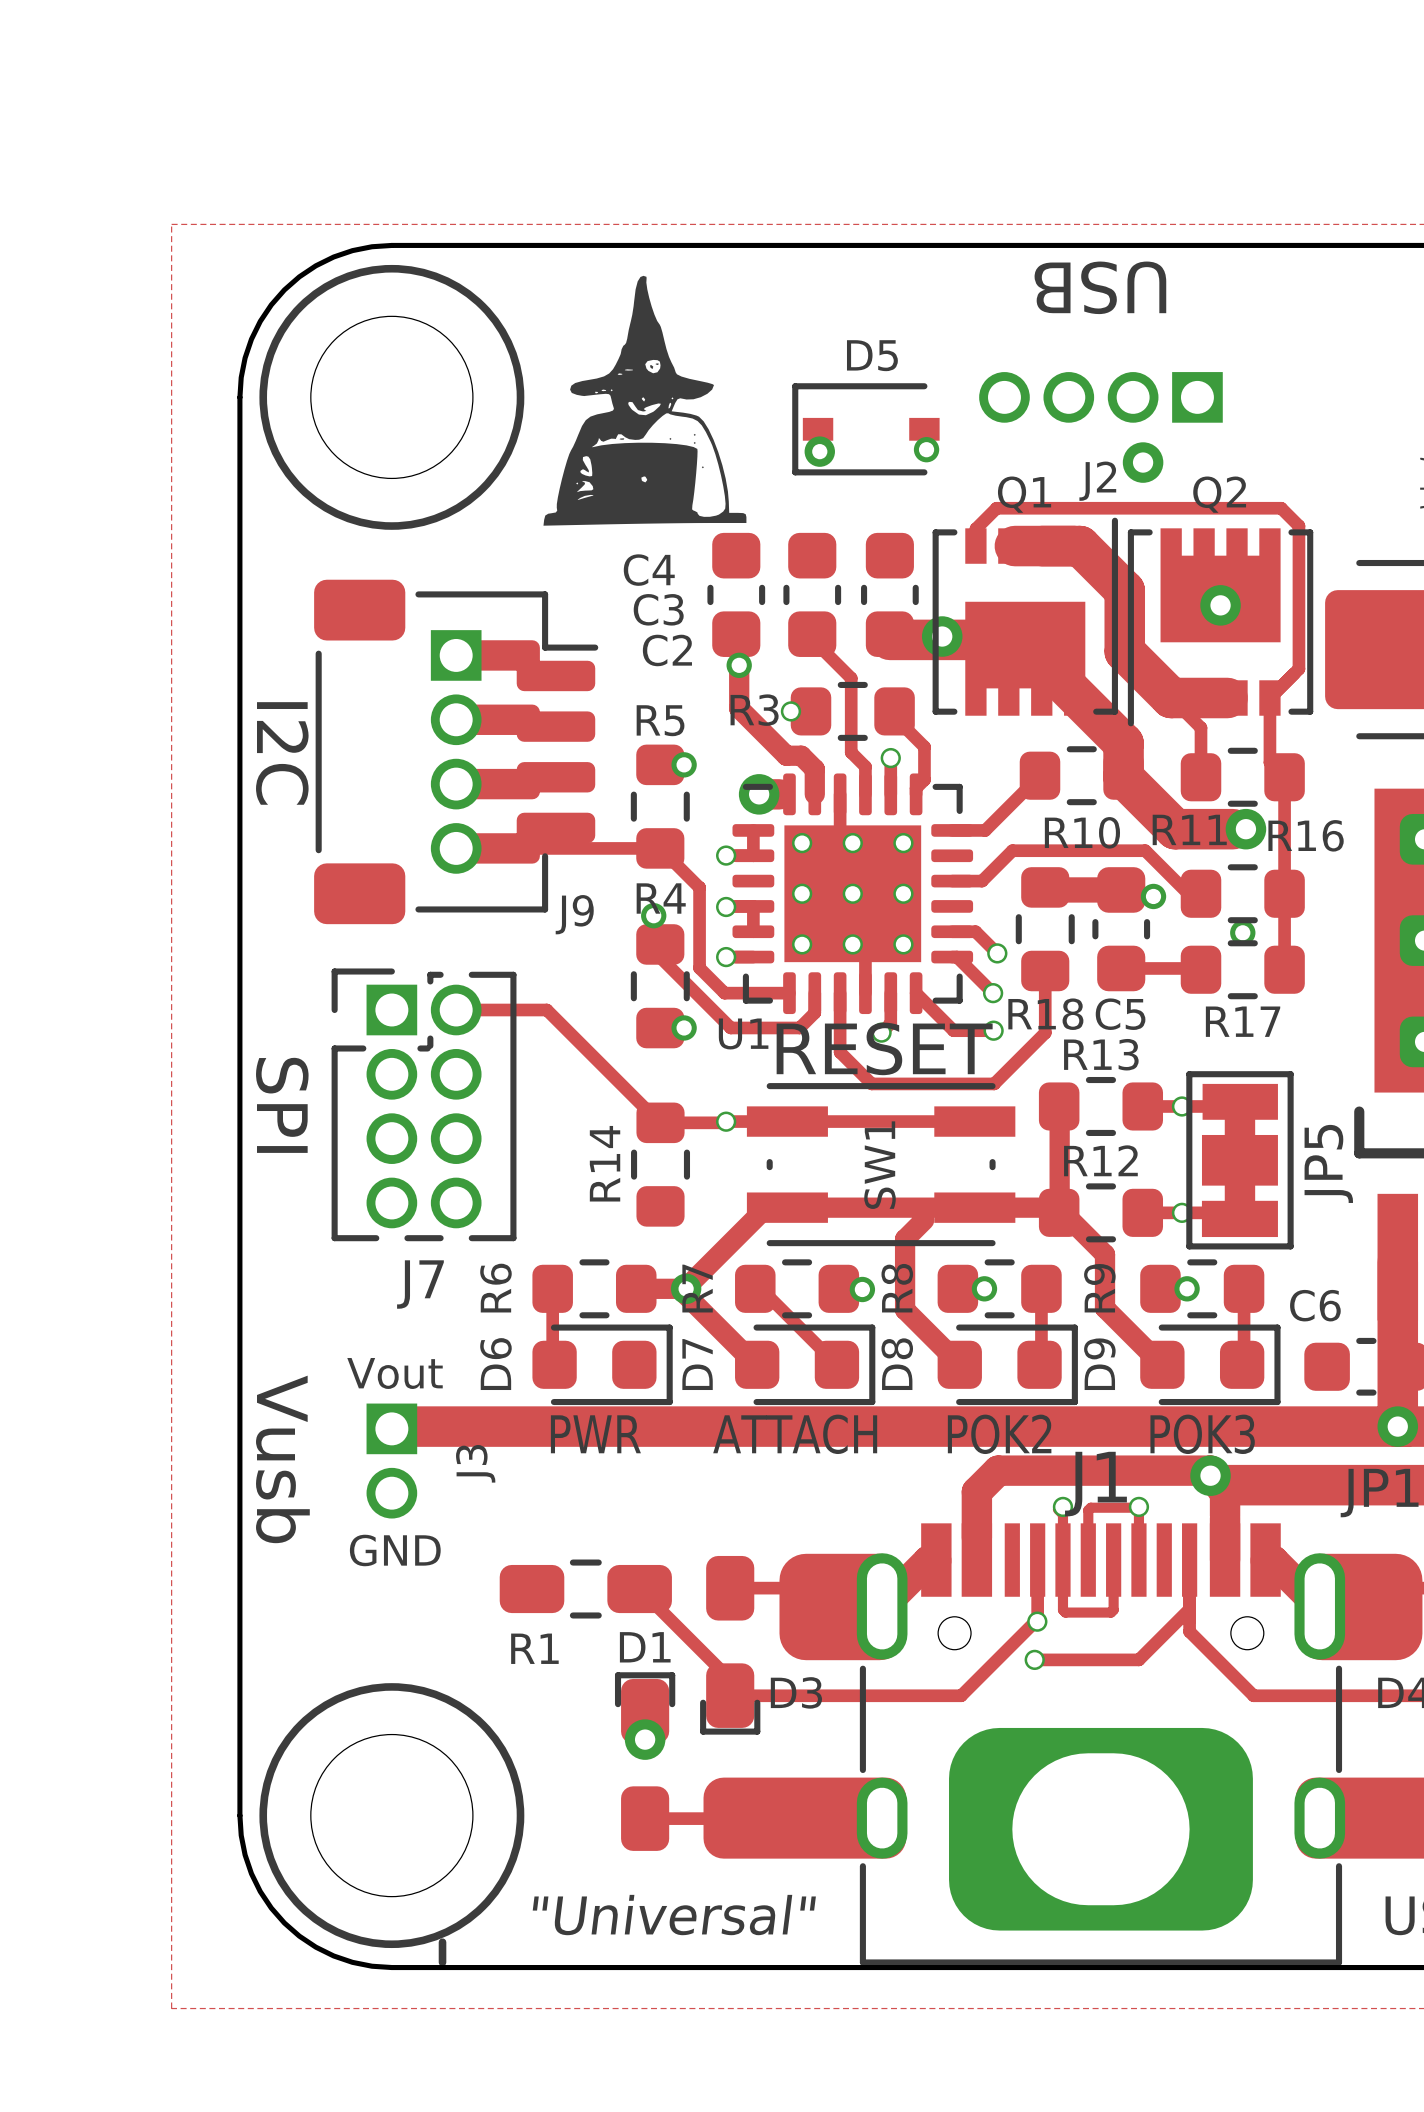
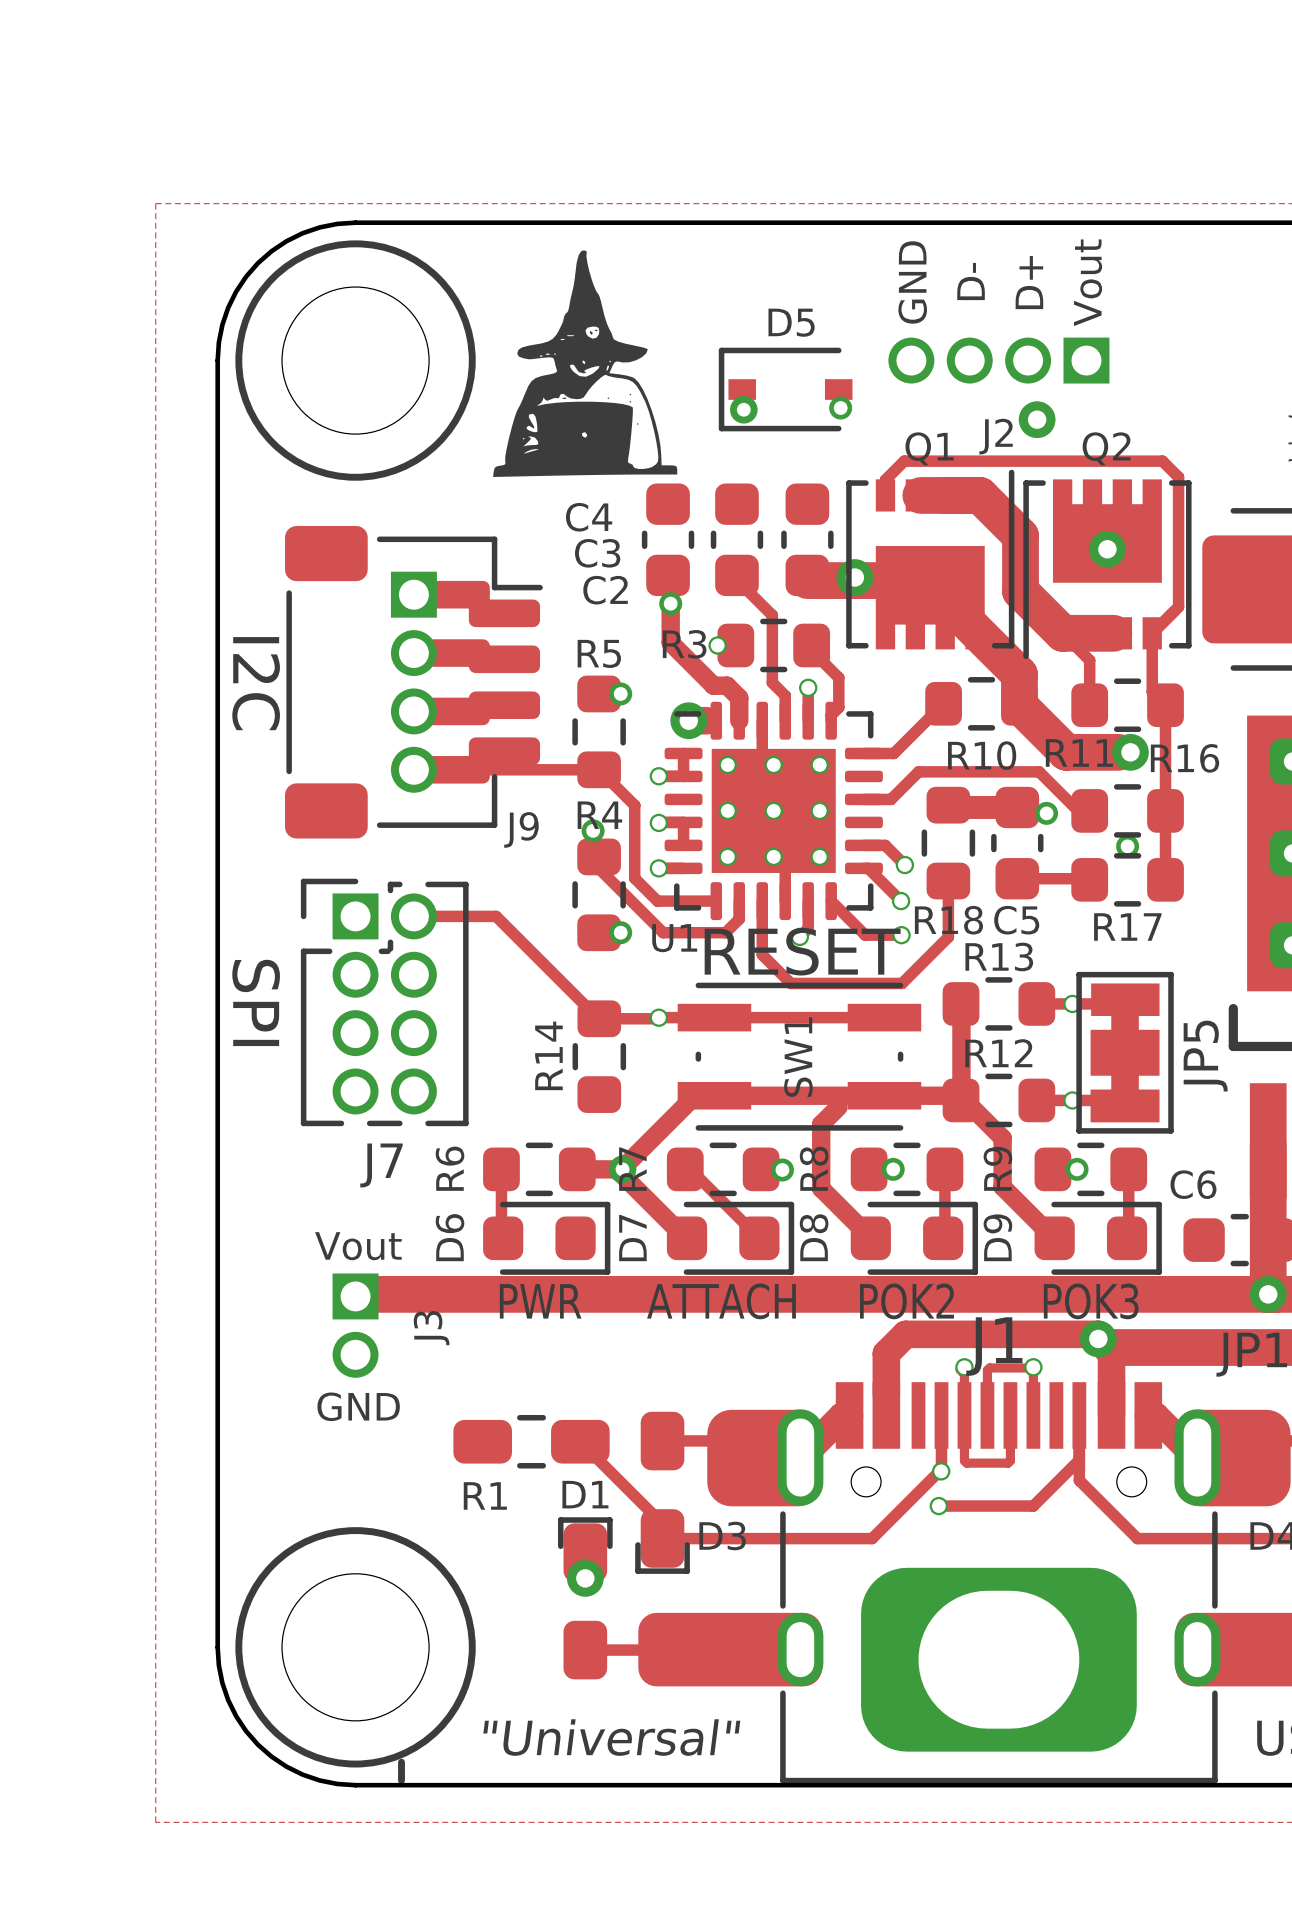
text: USB (1100, 287) -> none
text: none -> D- (971, 281)
text: none -> GND (912, 282)
text: none -> D+ (1029, 282)
text: none -> Vout (1088, 282)
text: Vusb (282, 1459) -> none

